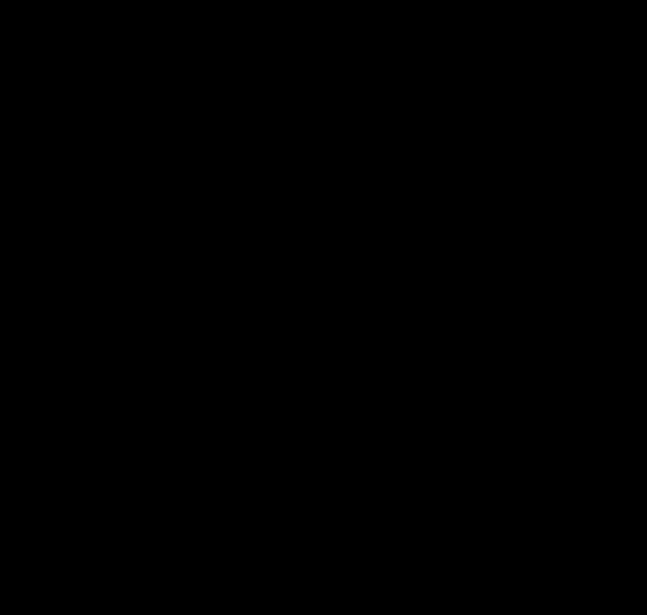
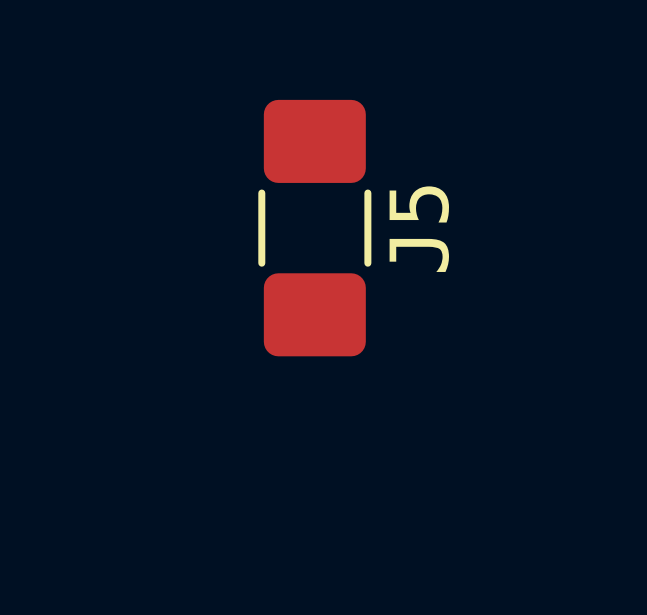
J5: none -> (314, 228)

